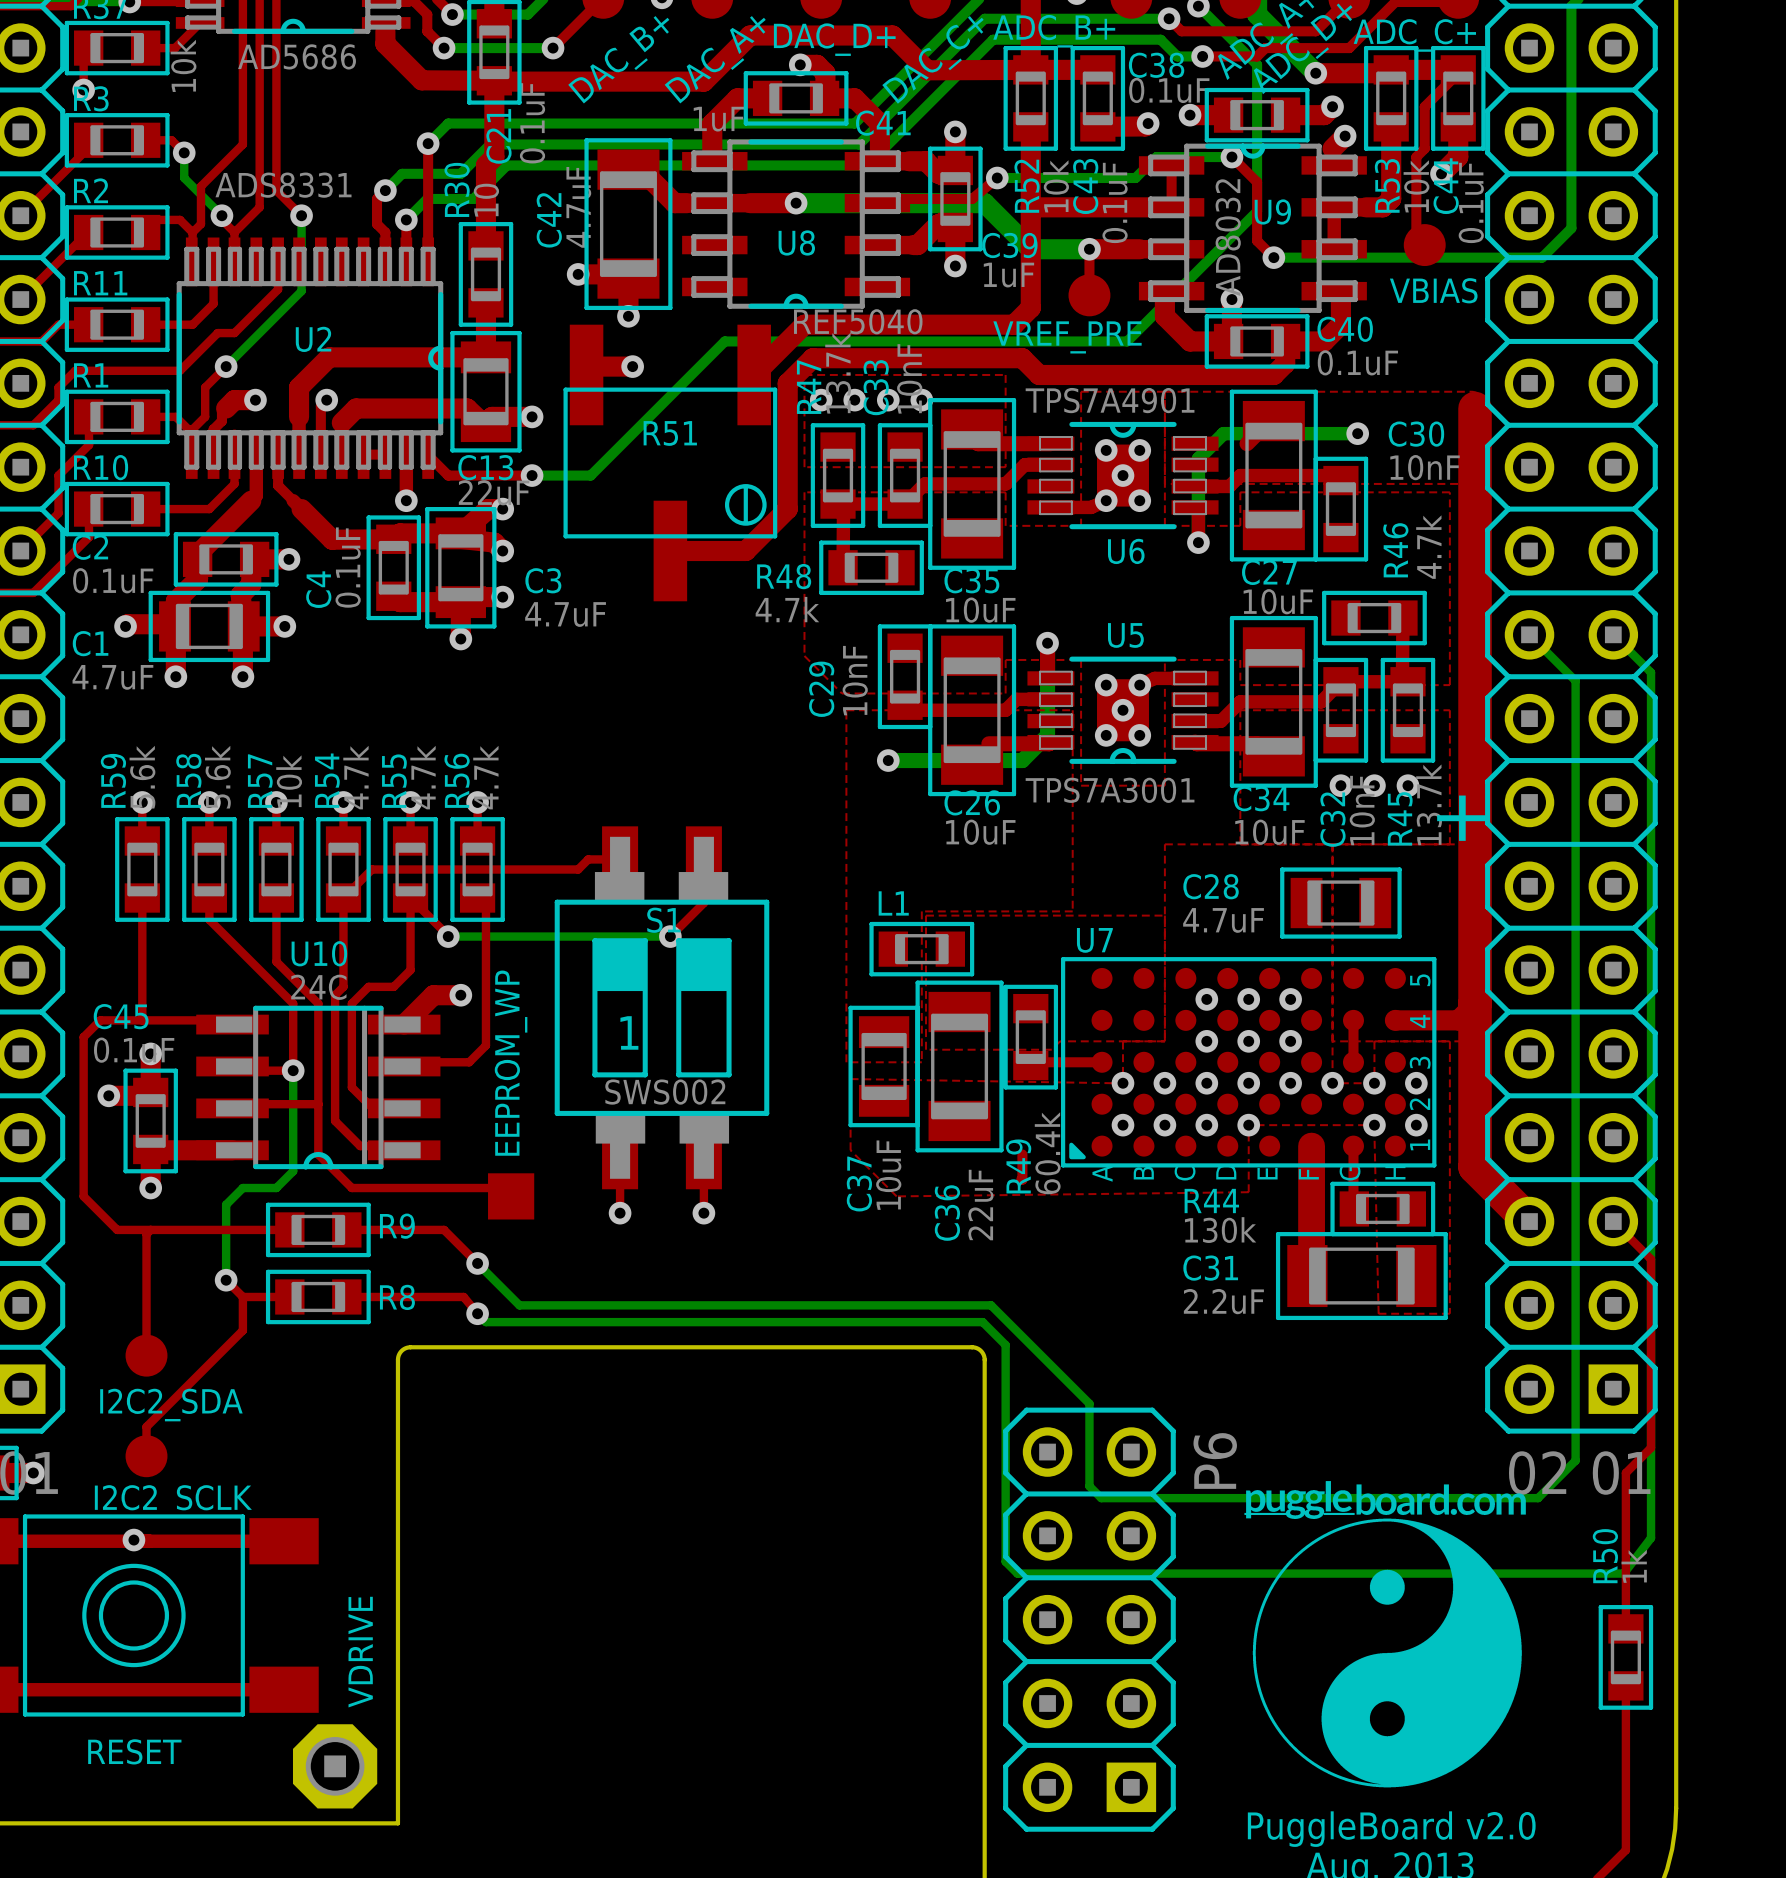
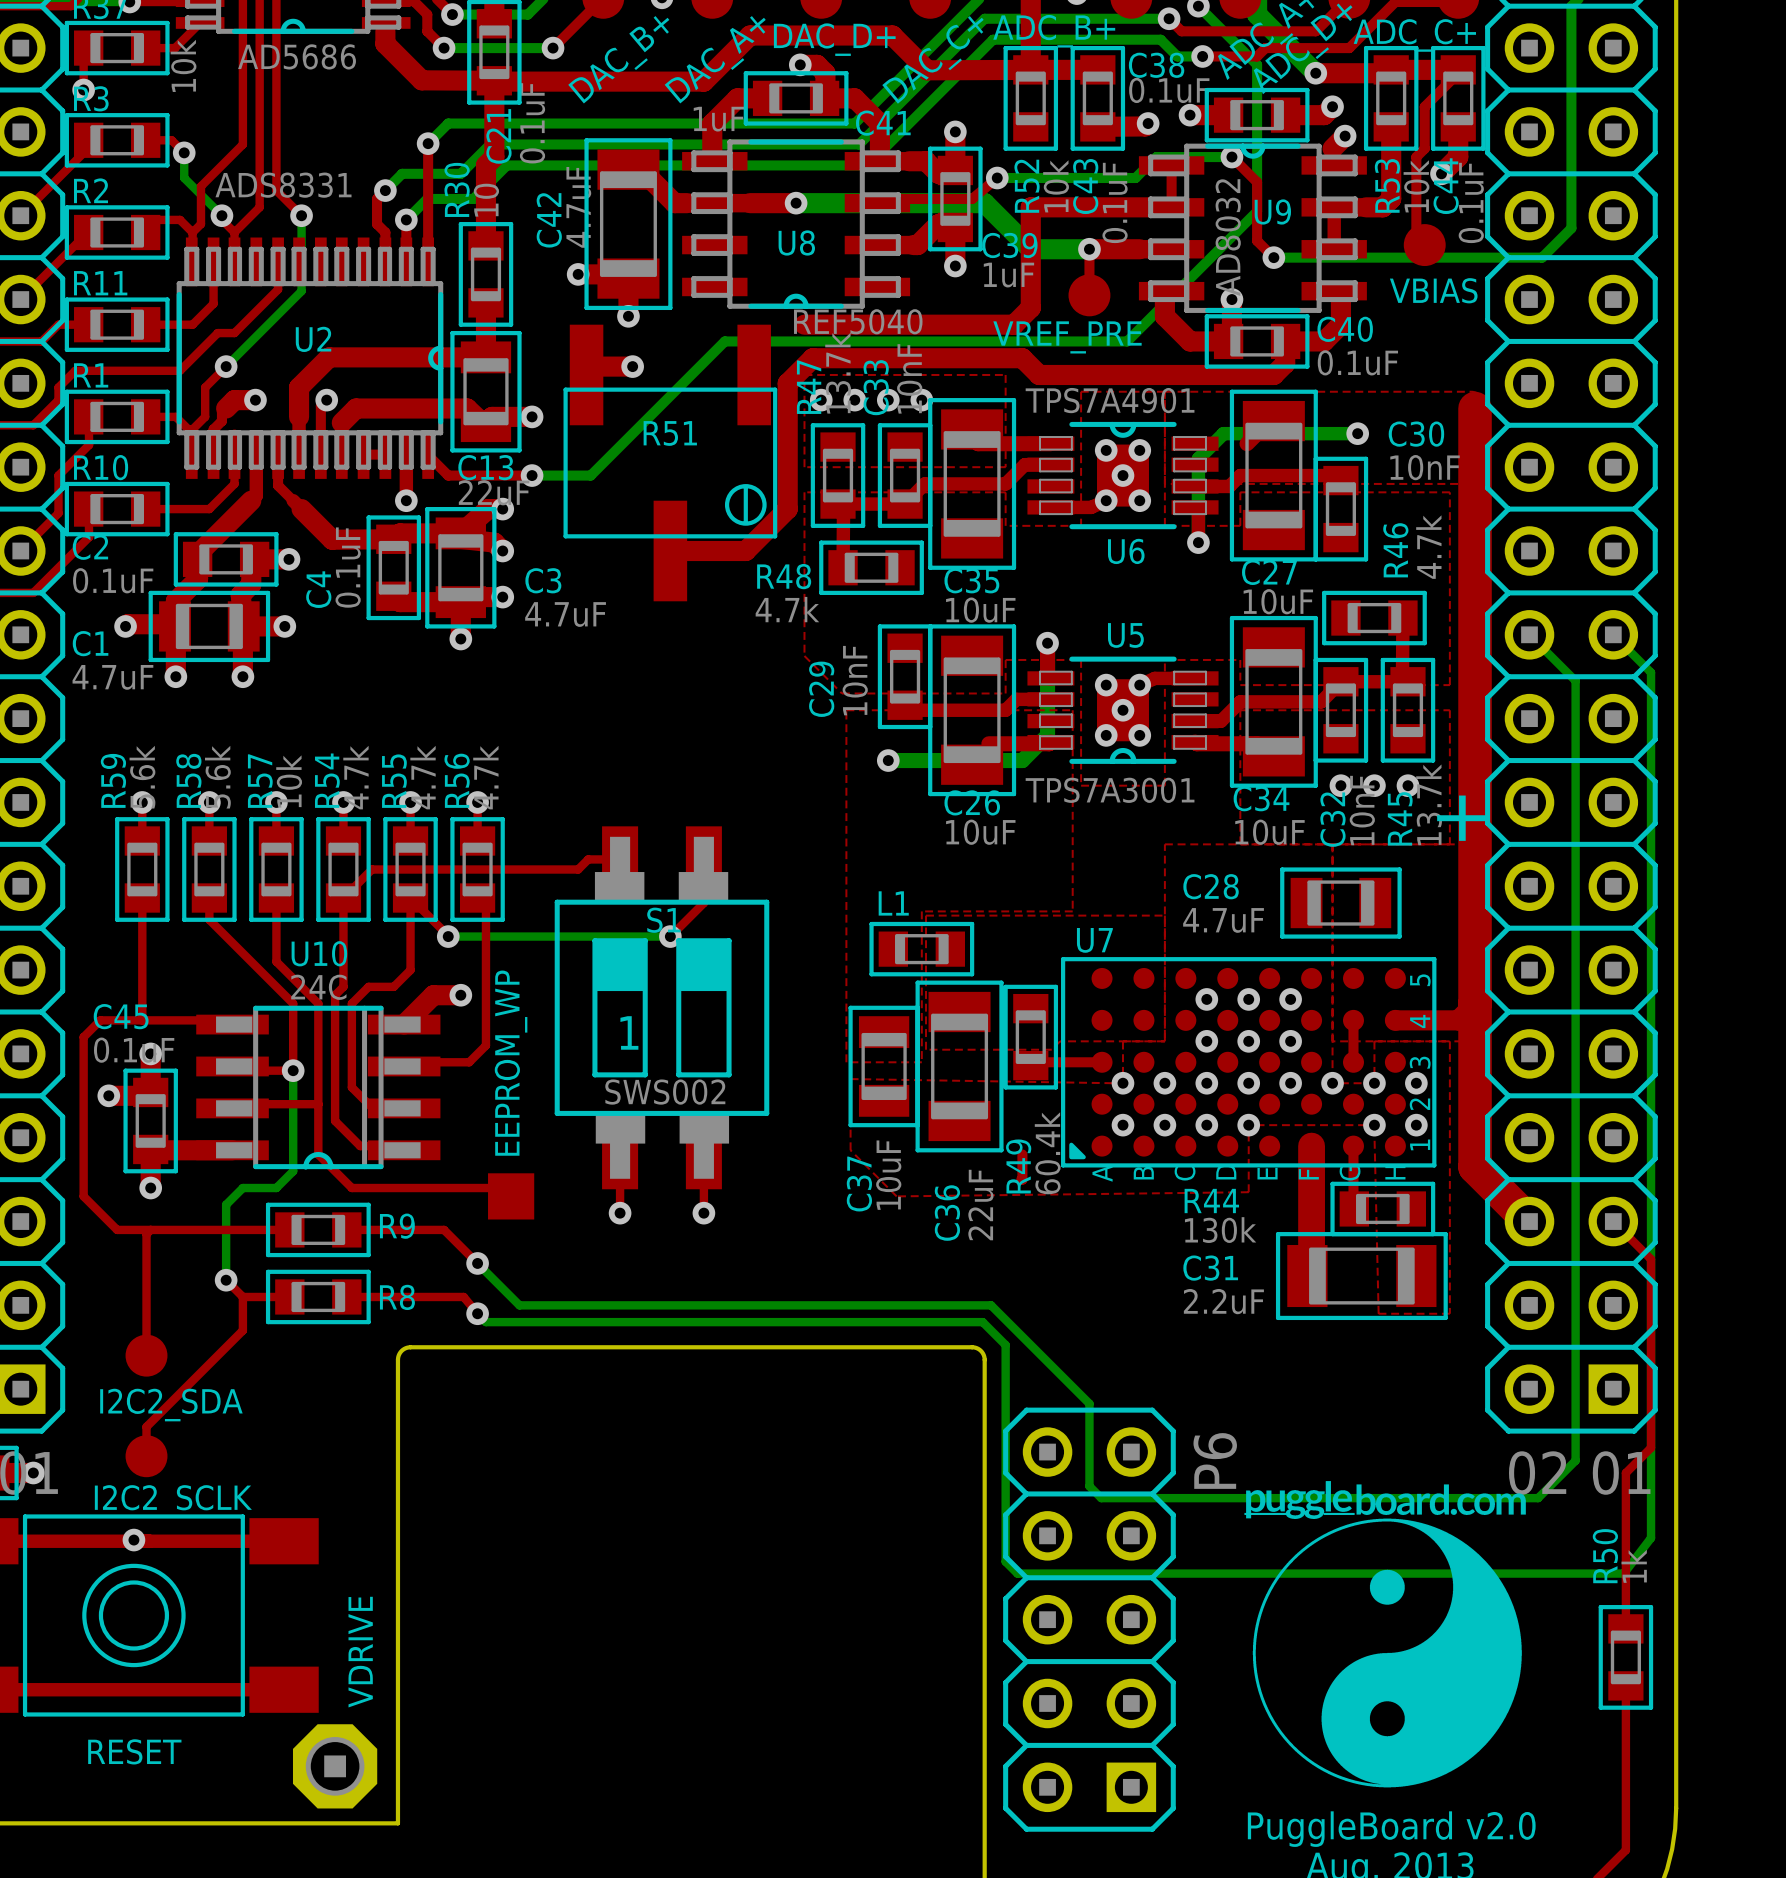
top track: (1030, 126) (1030, 207) -> none
top track: (804, 324) (754, 374) -> none

